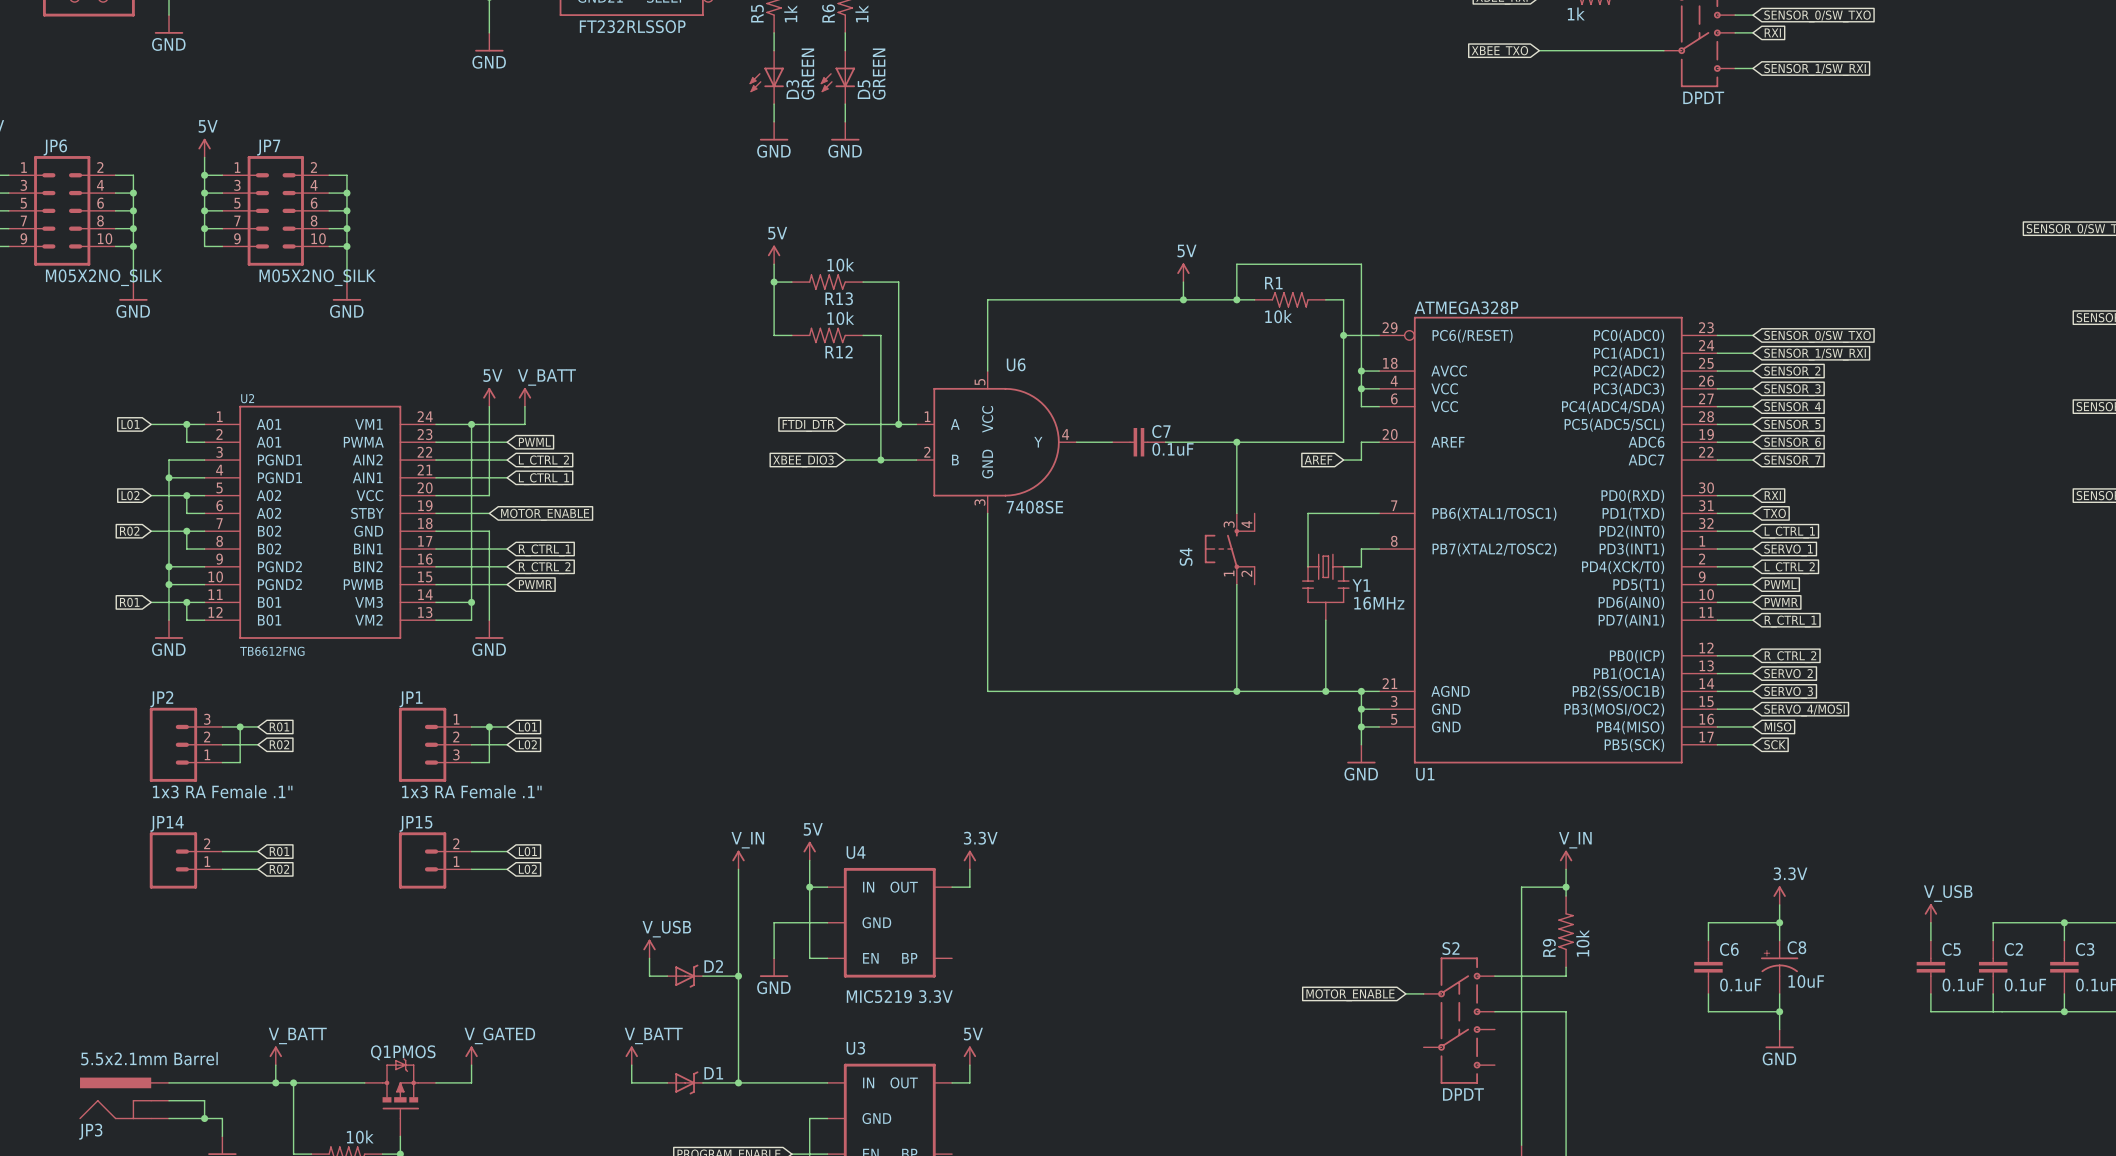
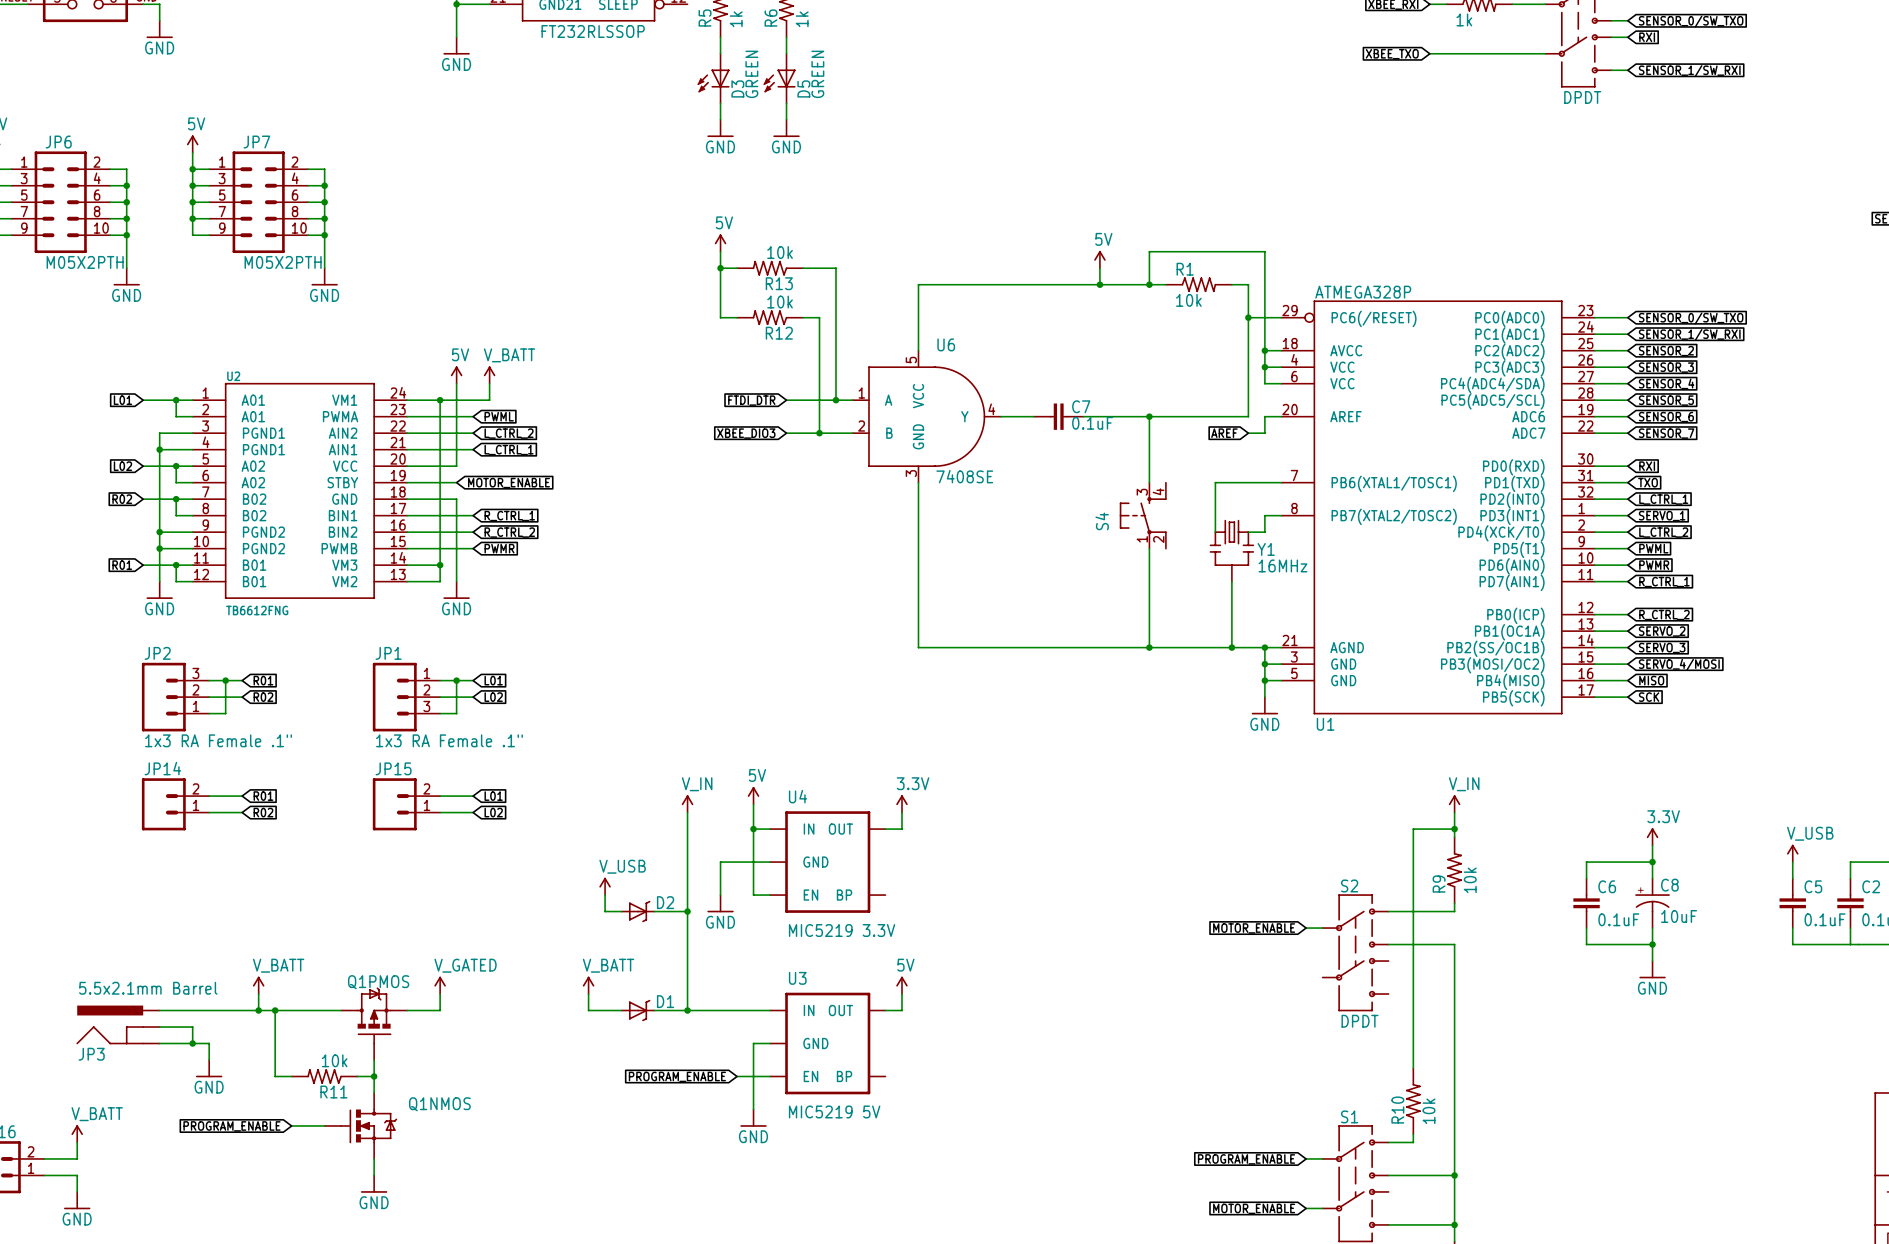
JP6 value: M05X2NO_SILK (104, 277) -> M05X2PTH (85, 262)
JP7 value: M05X2NO_SILK (317, 277) -> M05X2PTH (283, 262)

